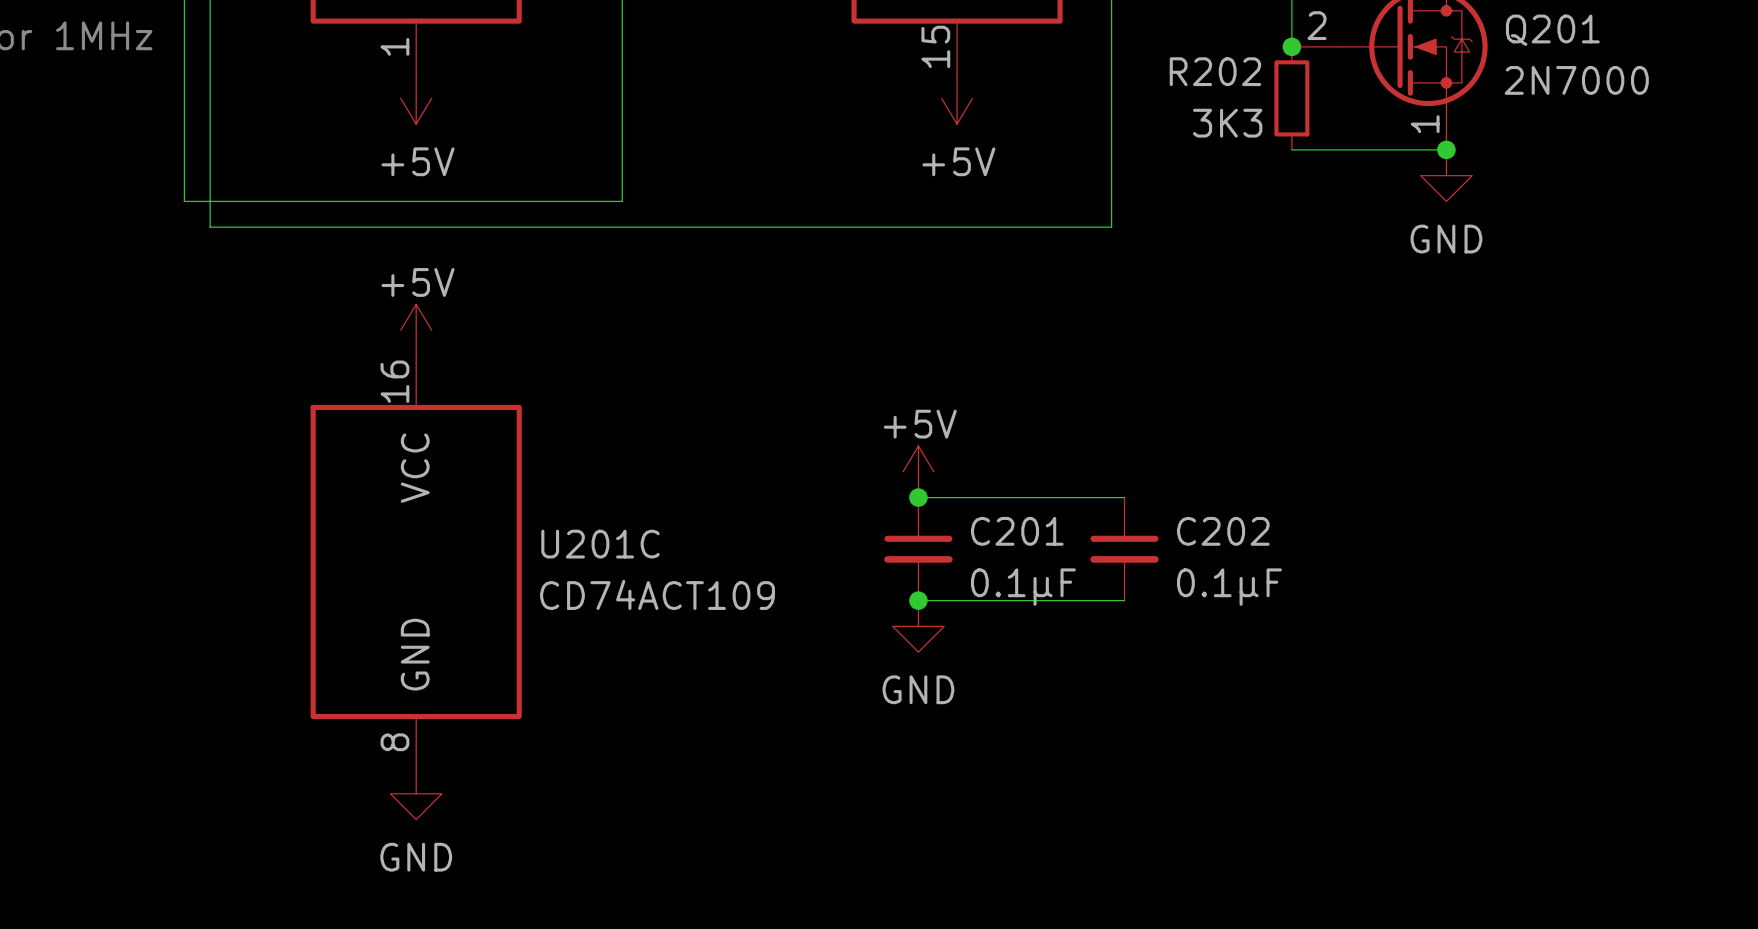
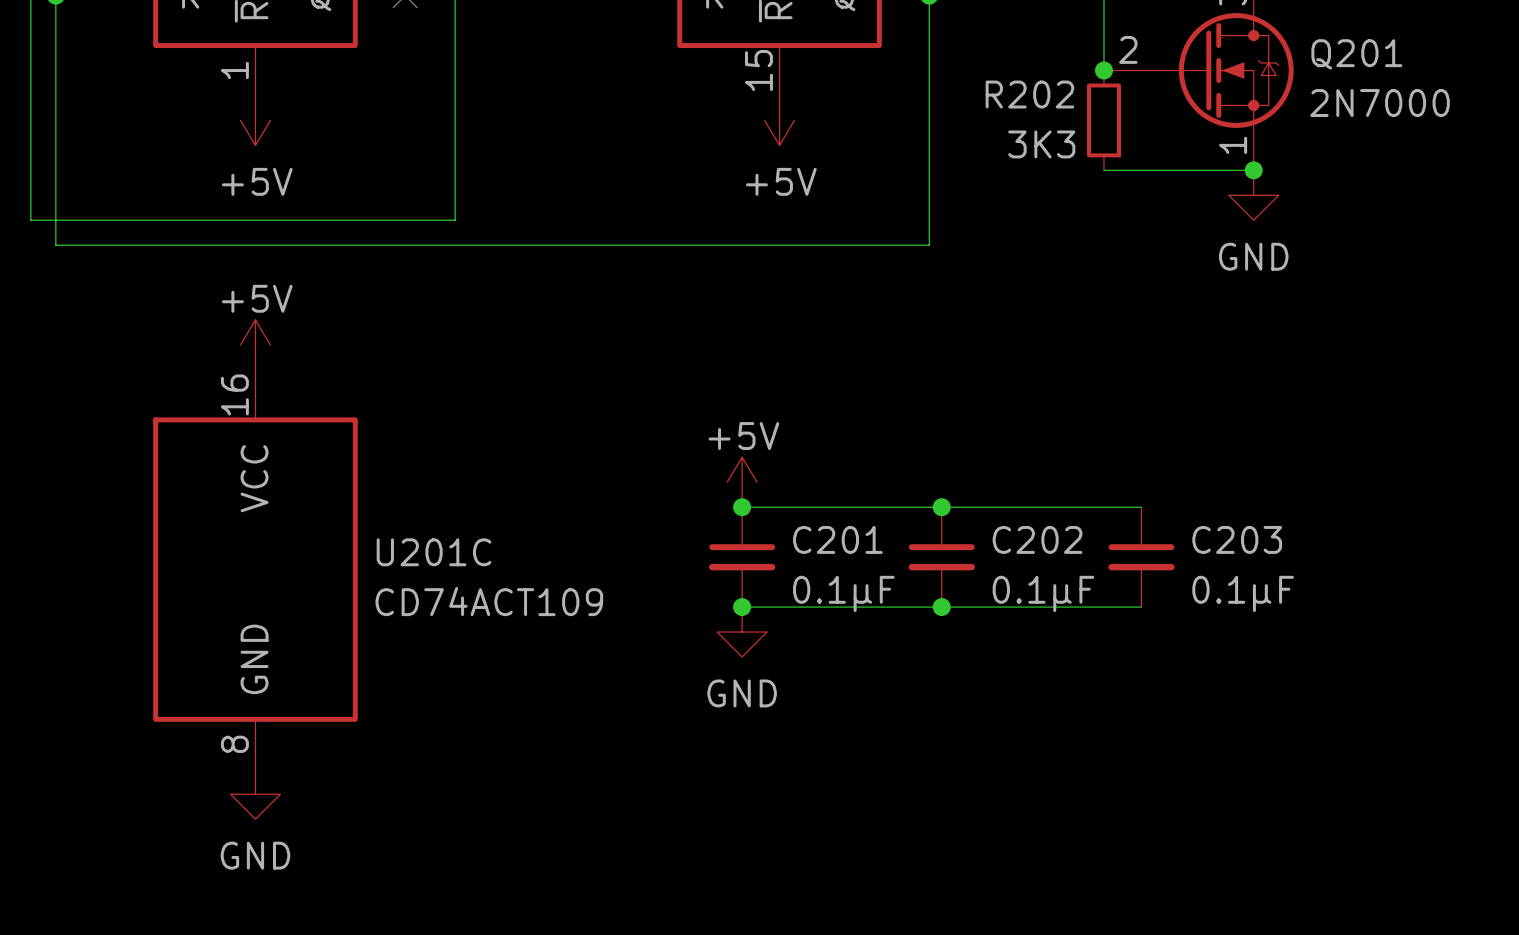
wire: none -> (941, 507) (1141, 507)
junction: none -> (941, 507)
C203: none -> 0.1µF (1141, 557)
wire: none -> (941, 607) (1141, 607)
junction: none -> (941, 607)

